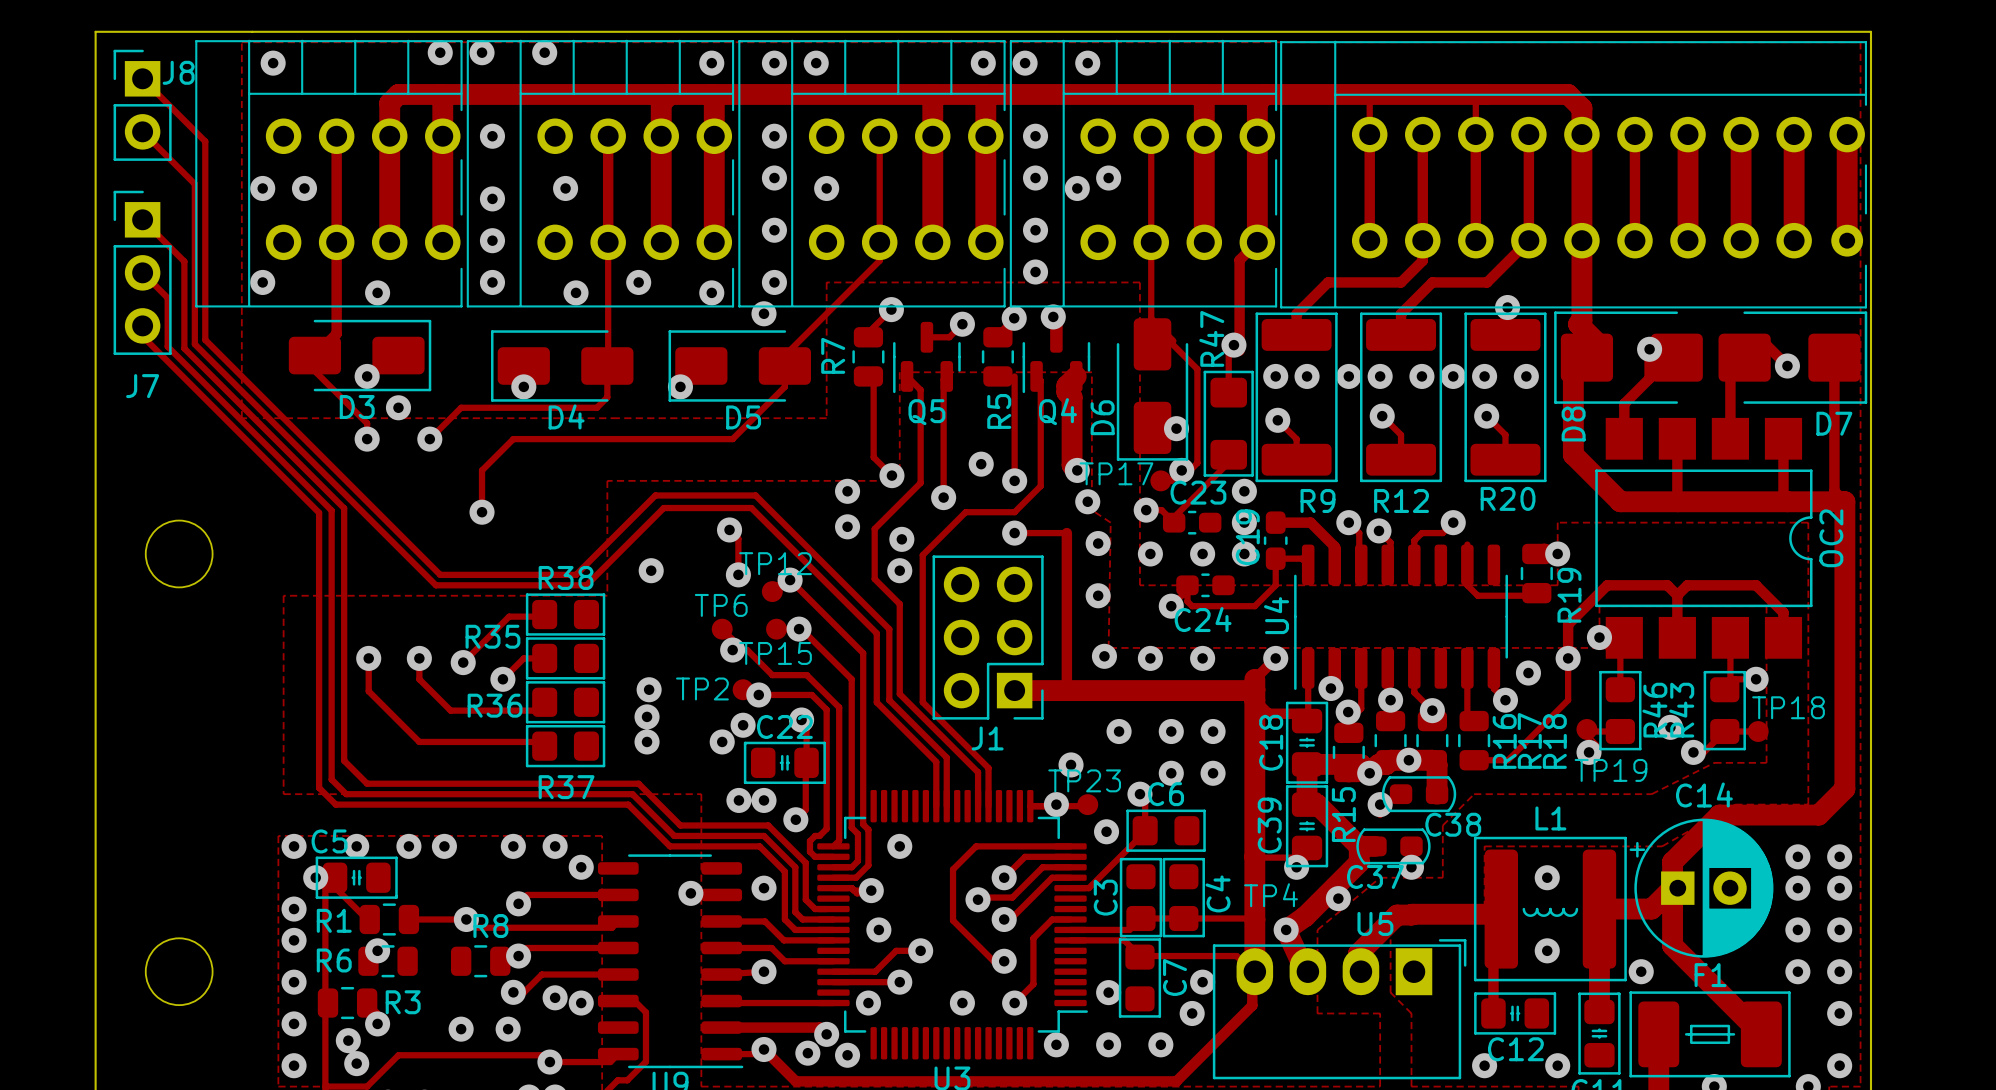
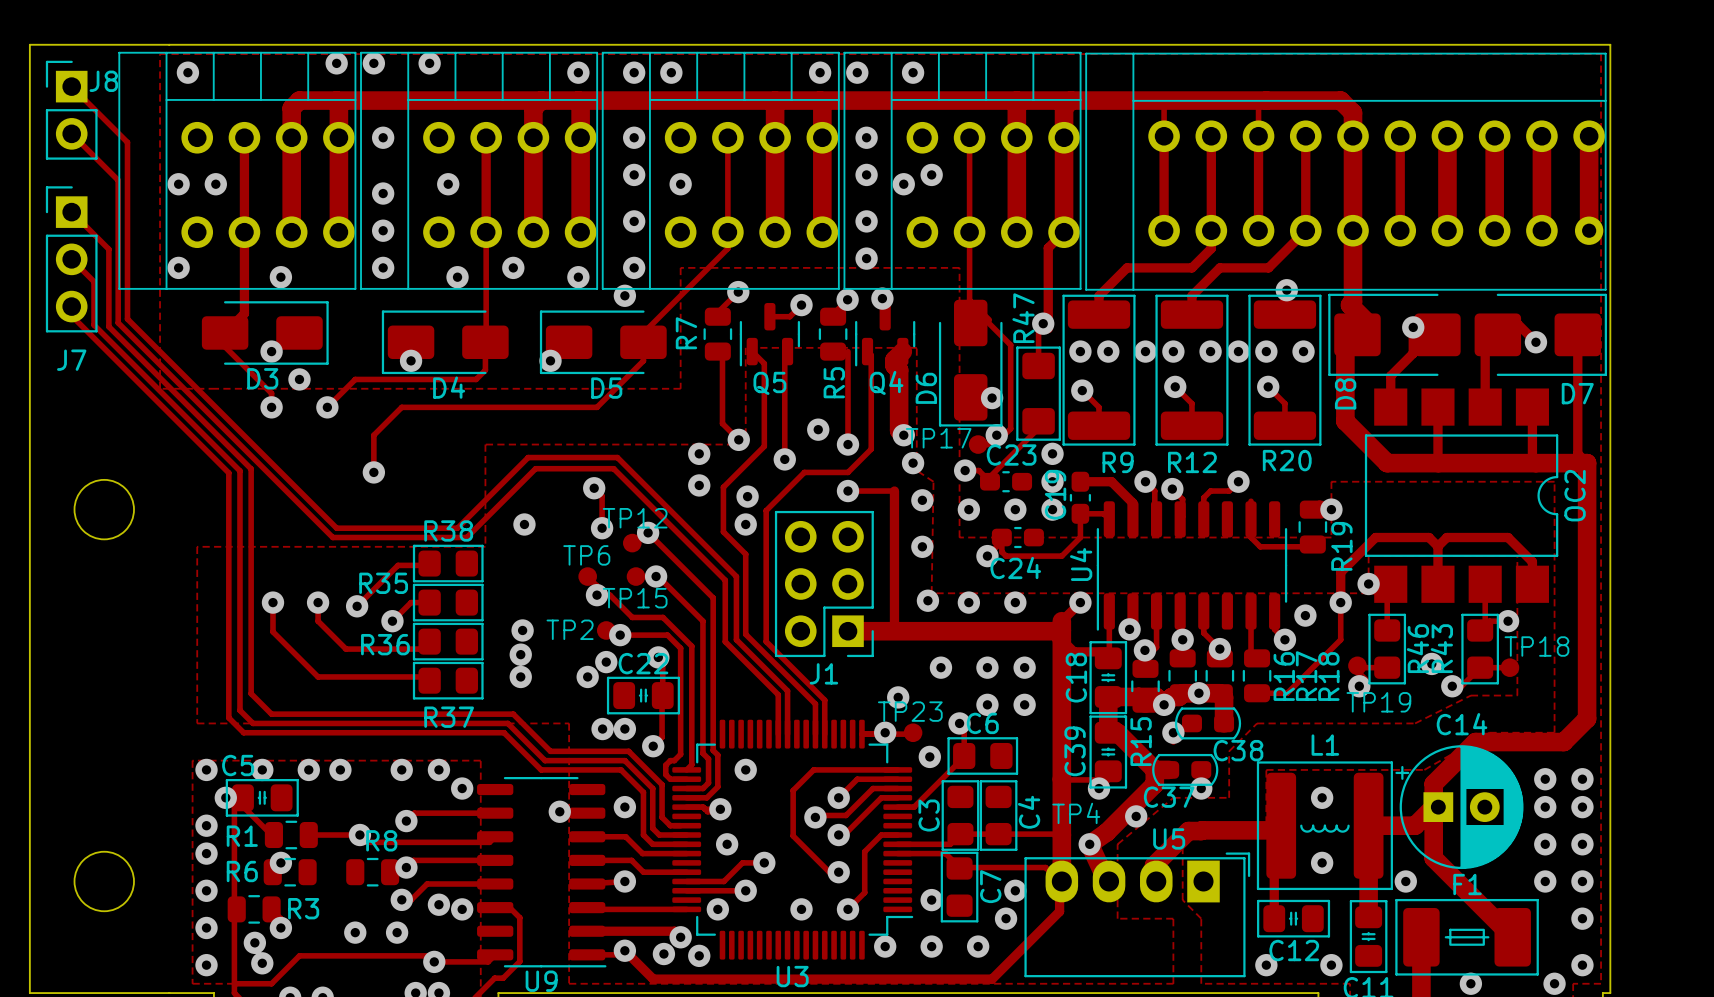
part footprint: [195, 39, 463, 308] -> [118, 51, 357, 290]
part footprint: [466, 39, 735, 308] -> [360, 51, 599, 290]
part footprint: [738, 39, 1006, 308] -> [601, 51, 840, 290]
part footprint: [1009, 39, 1278, 308] -> [843, 51, 1082, 290]
part footprint: [1280, 40, 1868, 309] -> [1085, 52, 1607, 291]

